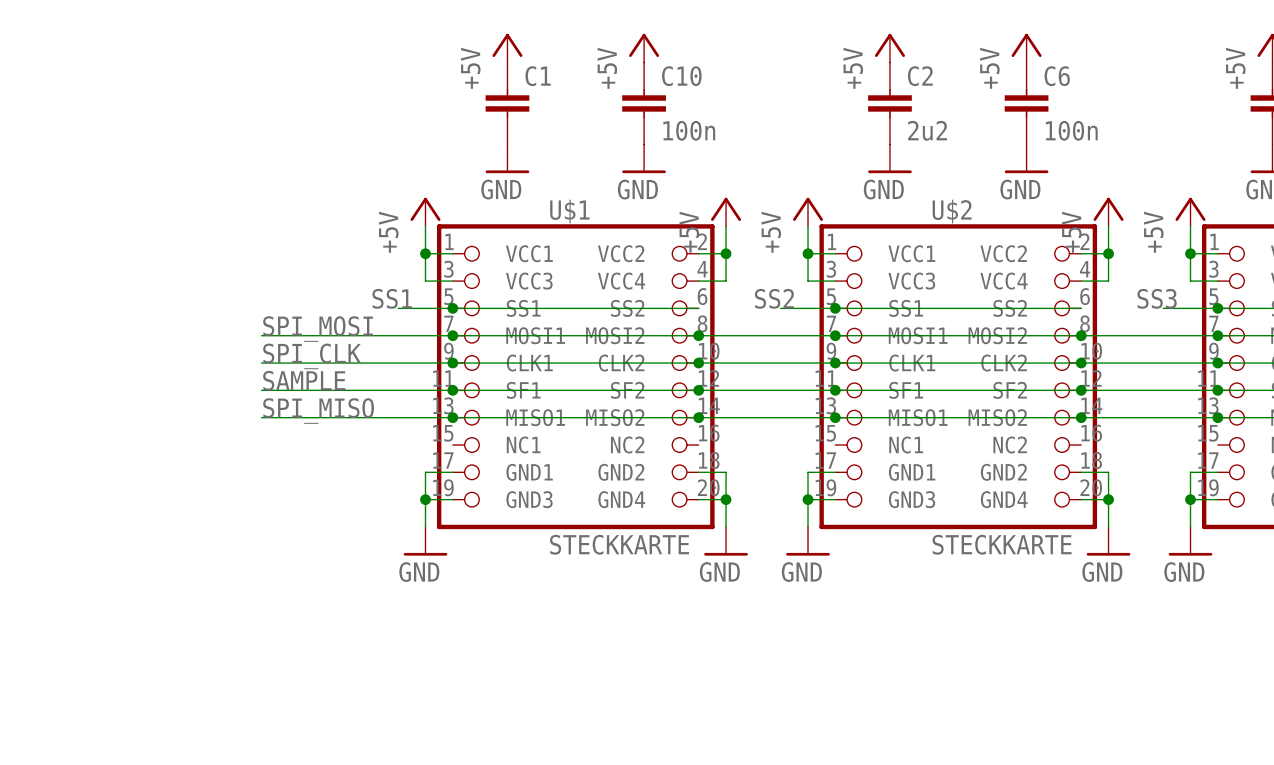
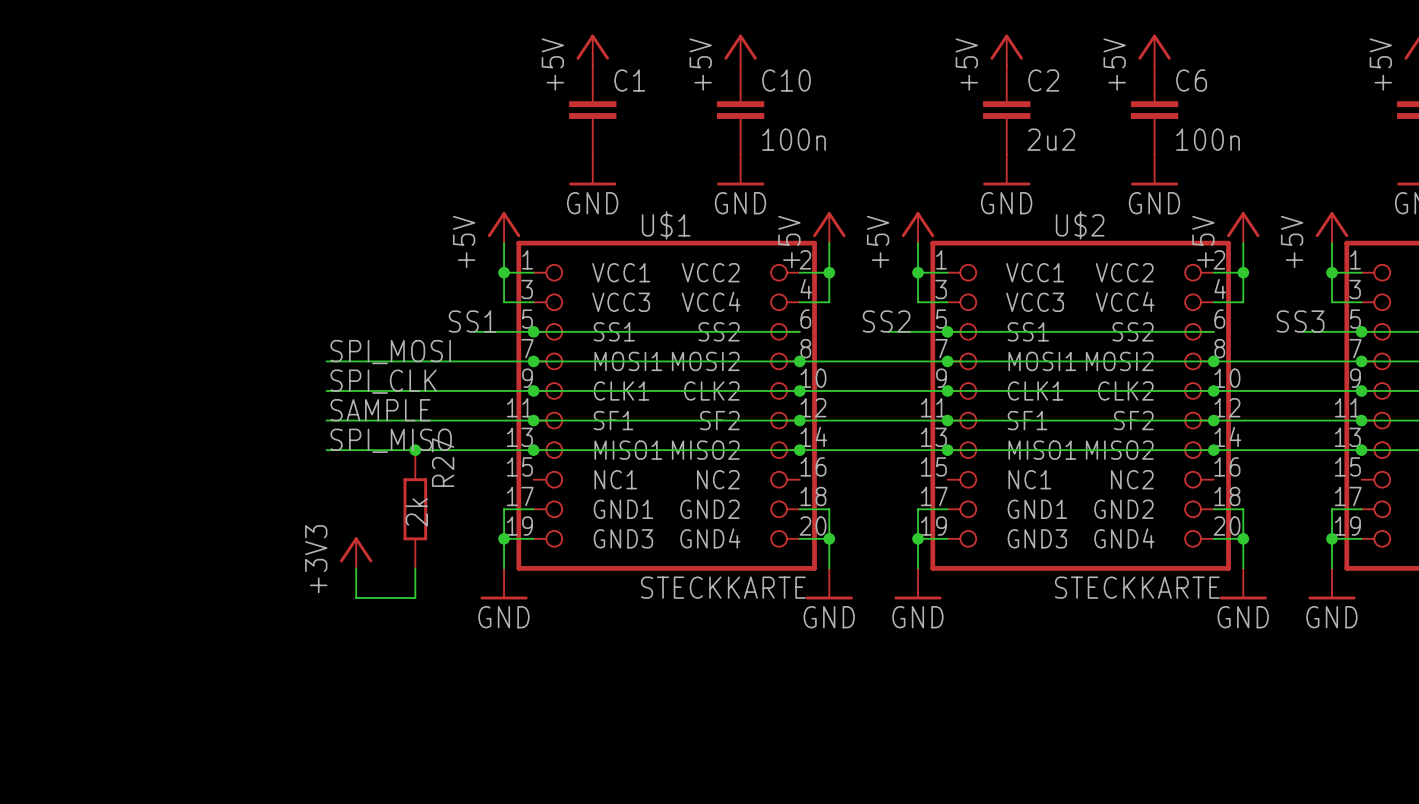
junction: none -> (415, 450)
R27: none -> 2k (415, 509)
power symbol: none -> +3V3 (356, 552)
wire: none -> (356, 568) (356, 597) (415, 597) (415, 568)

